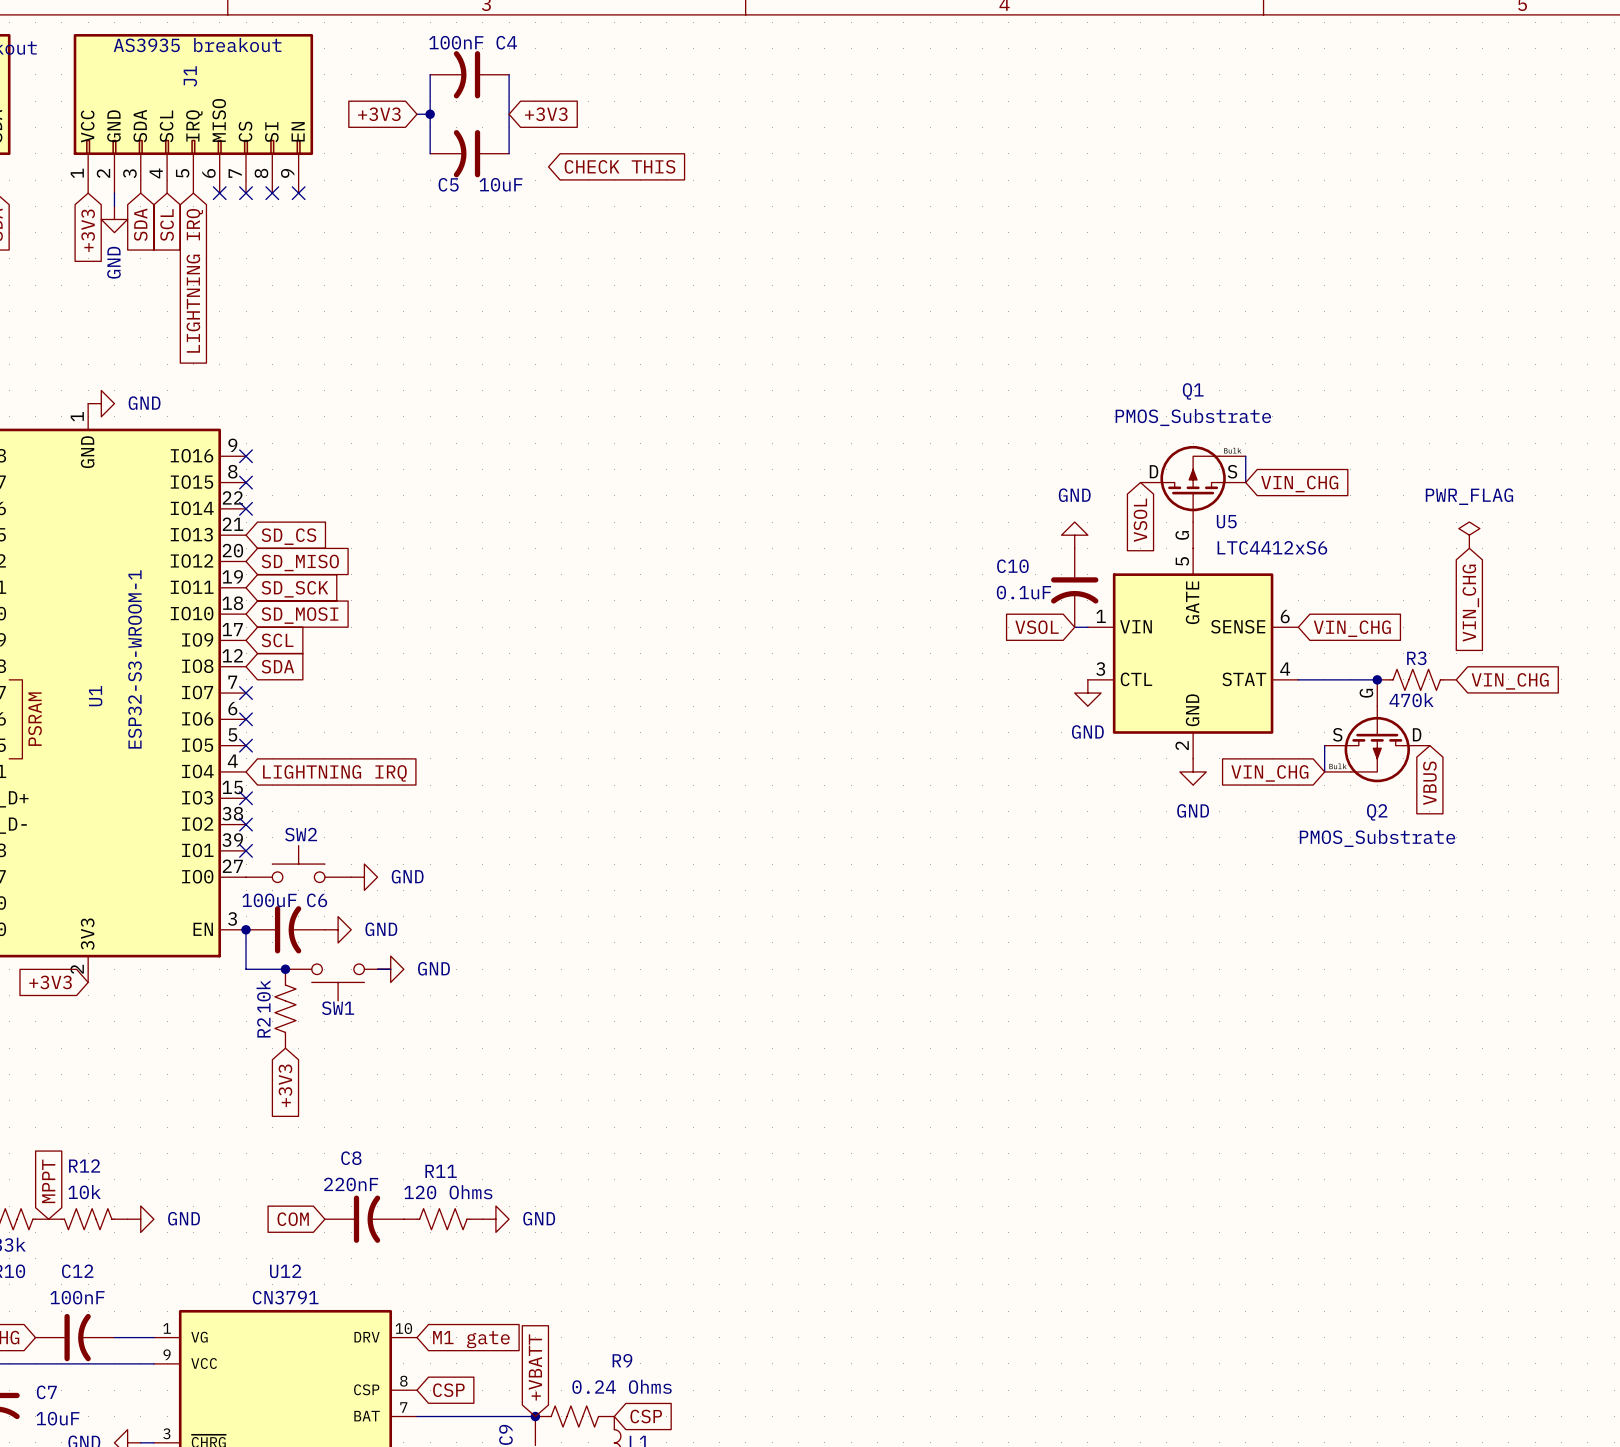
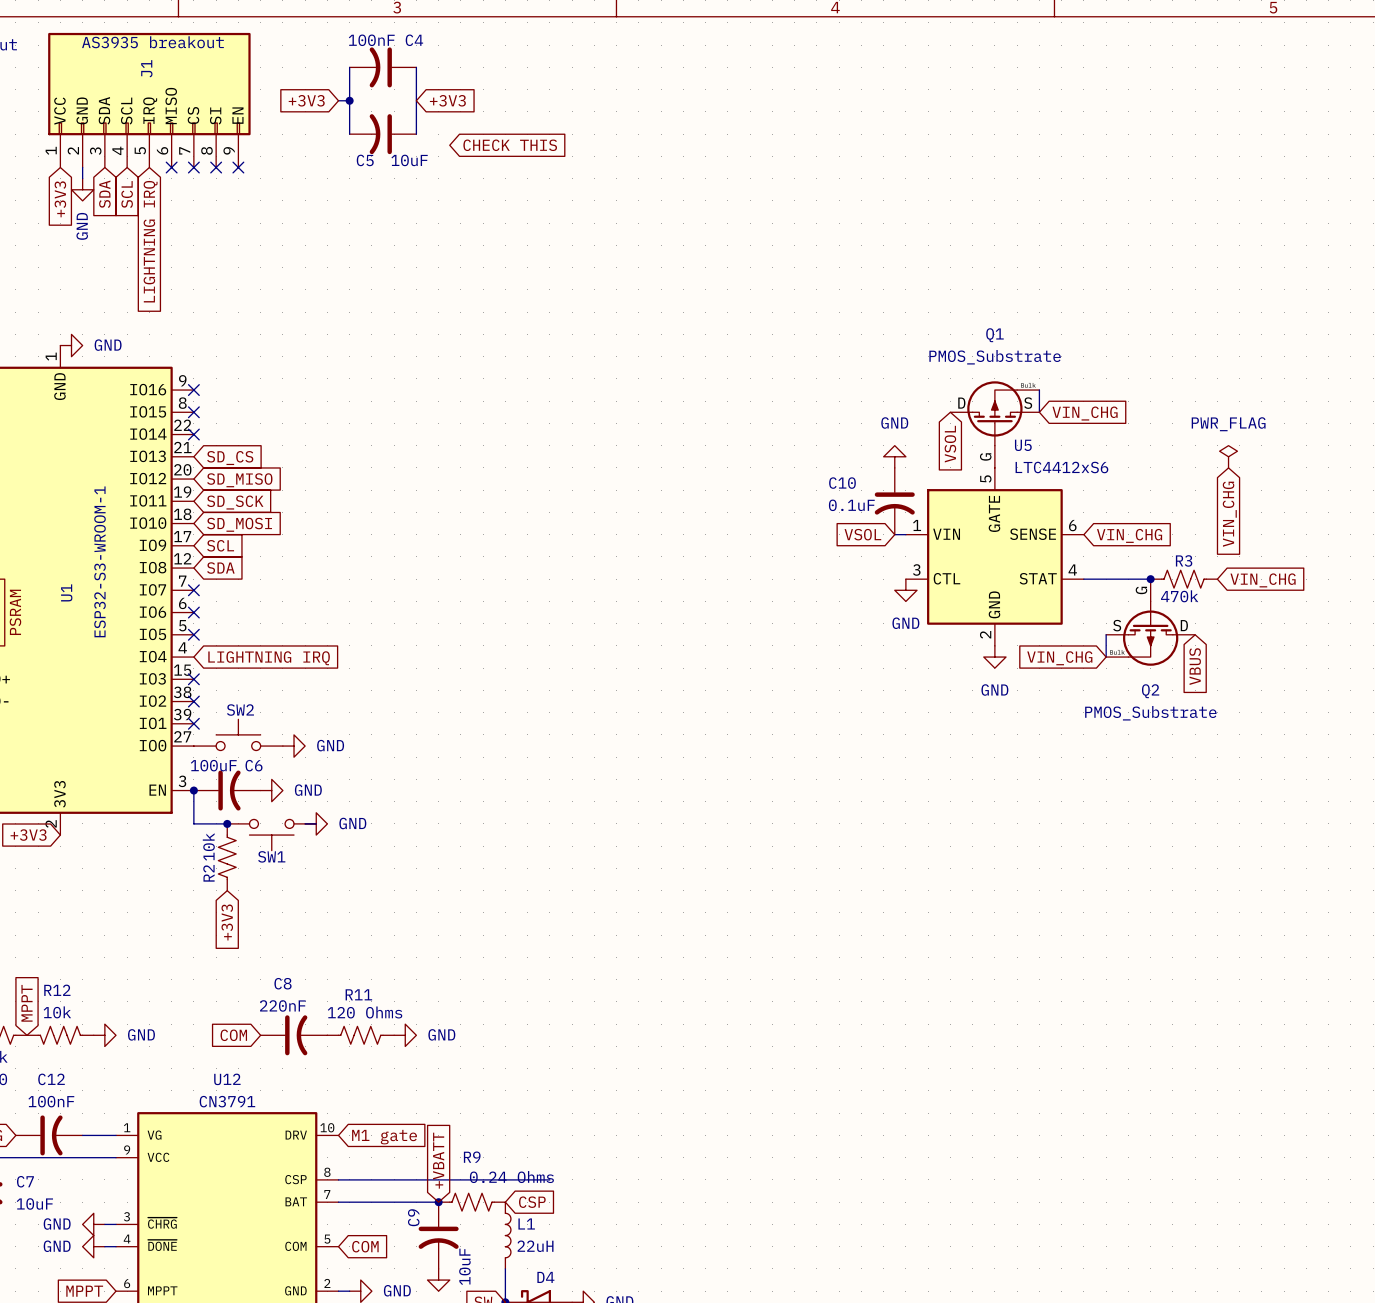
R9 name position: R9 (622, 1360) -> R9 (472, 1157)
wire: none -> (338, 1179) (549, 1179)
global label: CSP (448, 1390) -> none

